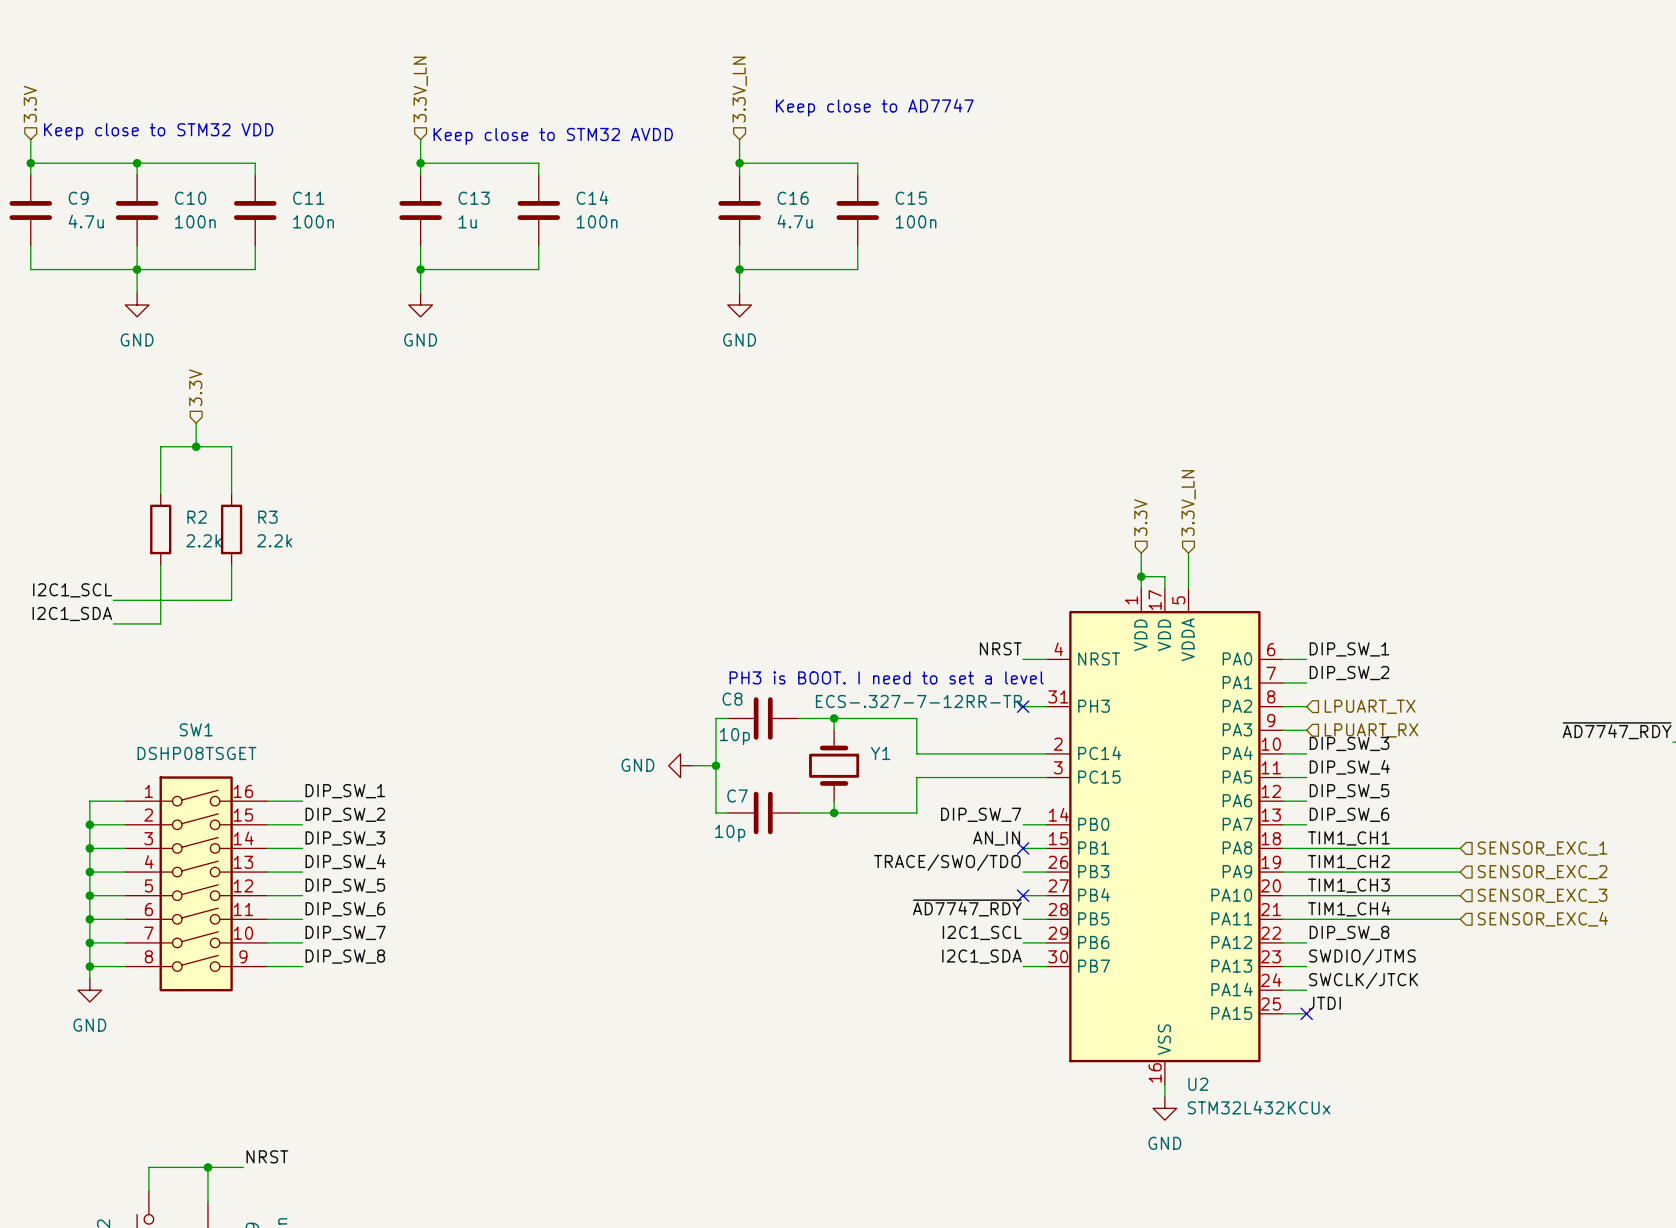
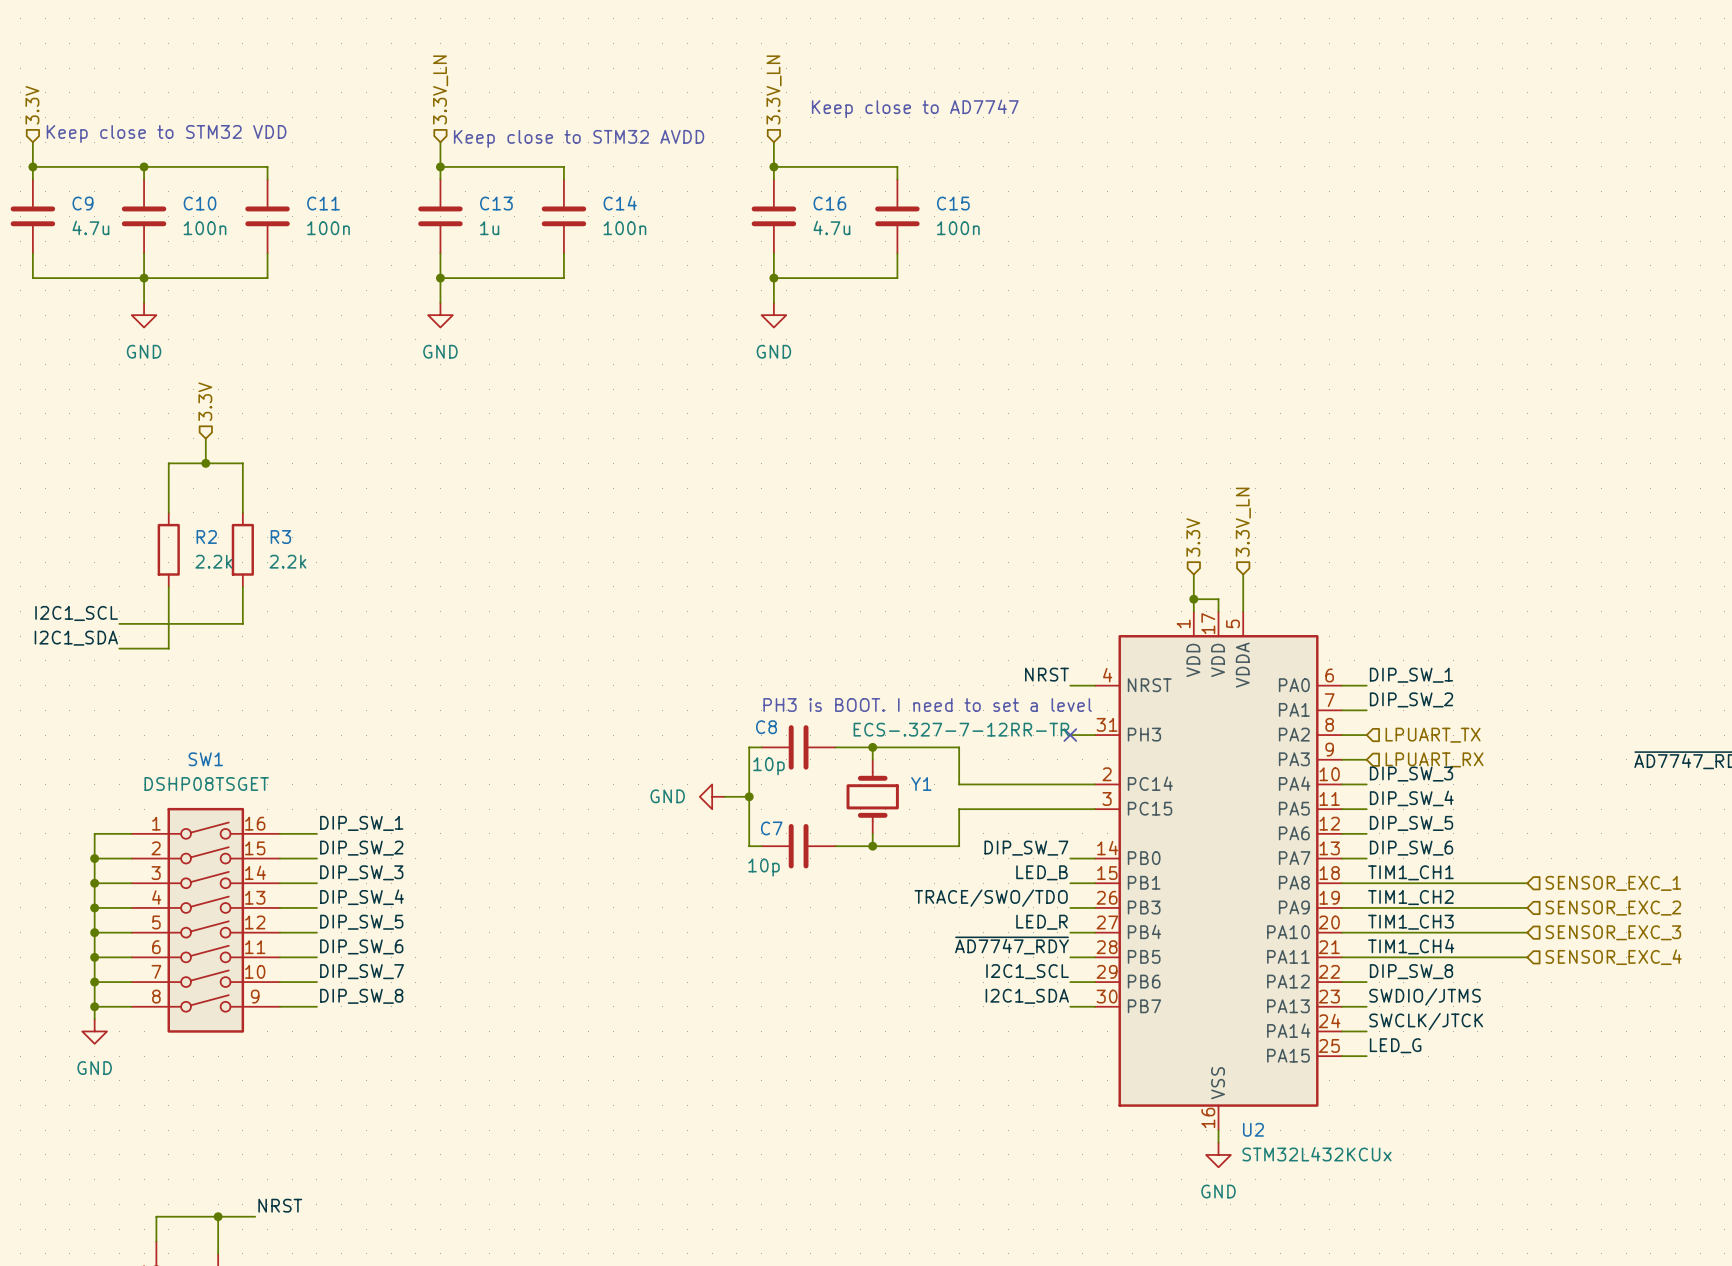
label: AN_IN (996, 838) -> LED_B (1041, 872)
no-connect mark: (1023, 848) -> none
label: none -> LED_R (1041, 922)
no-connect mark: (1023, 895) -> none
label: JTDI (1324, 1003) -> LED_G (1395, 1045)
no-connect mark: (1306, 1013) -> none

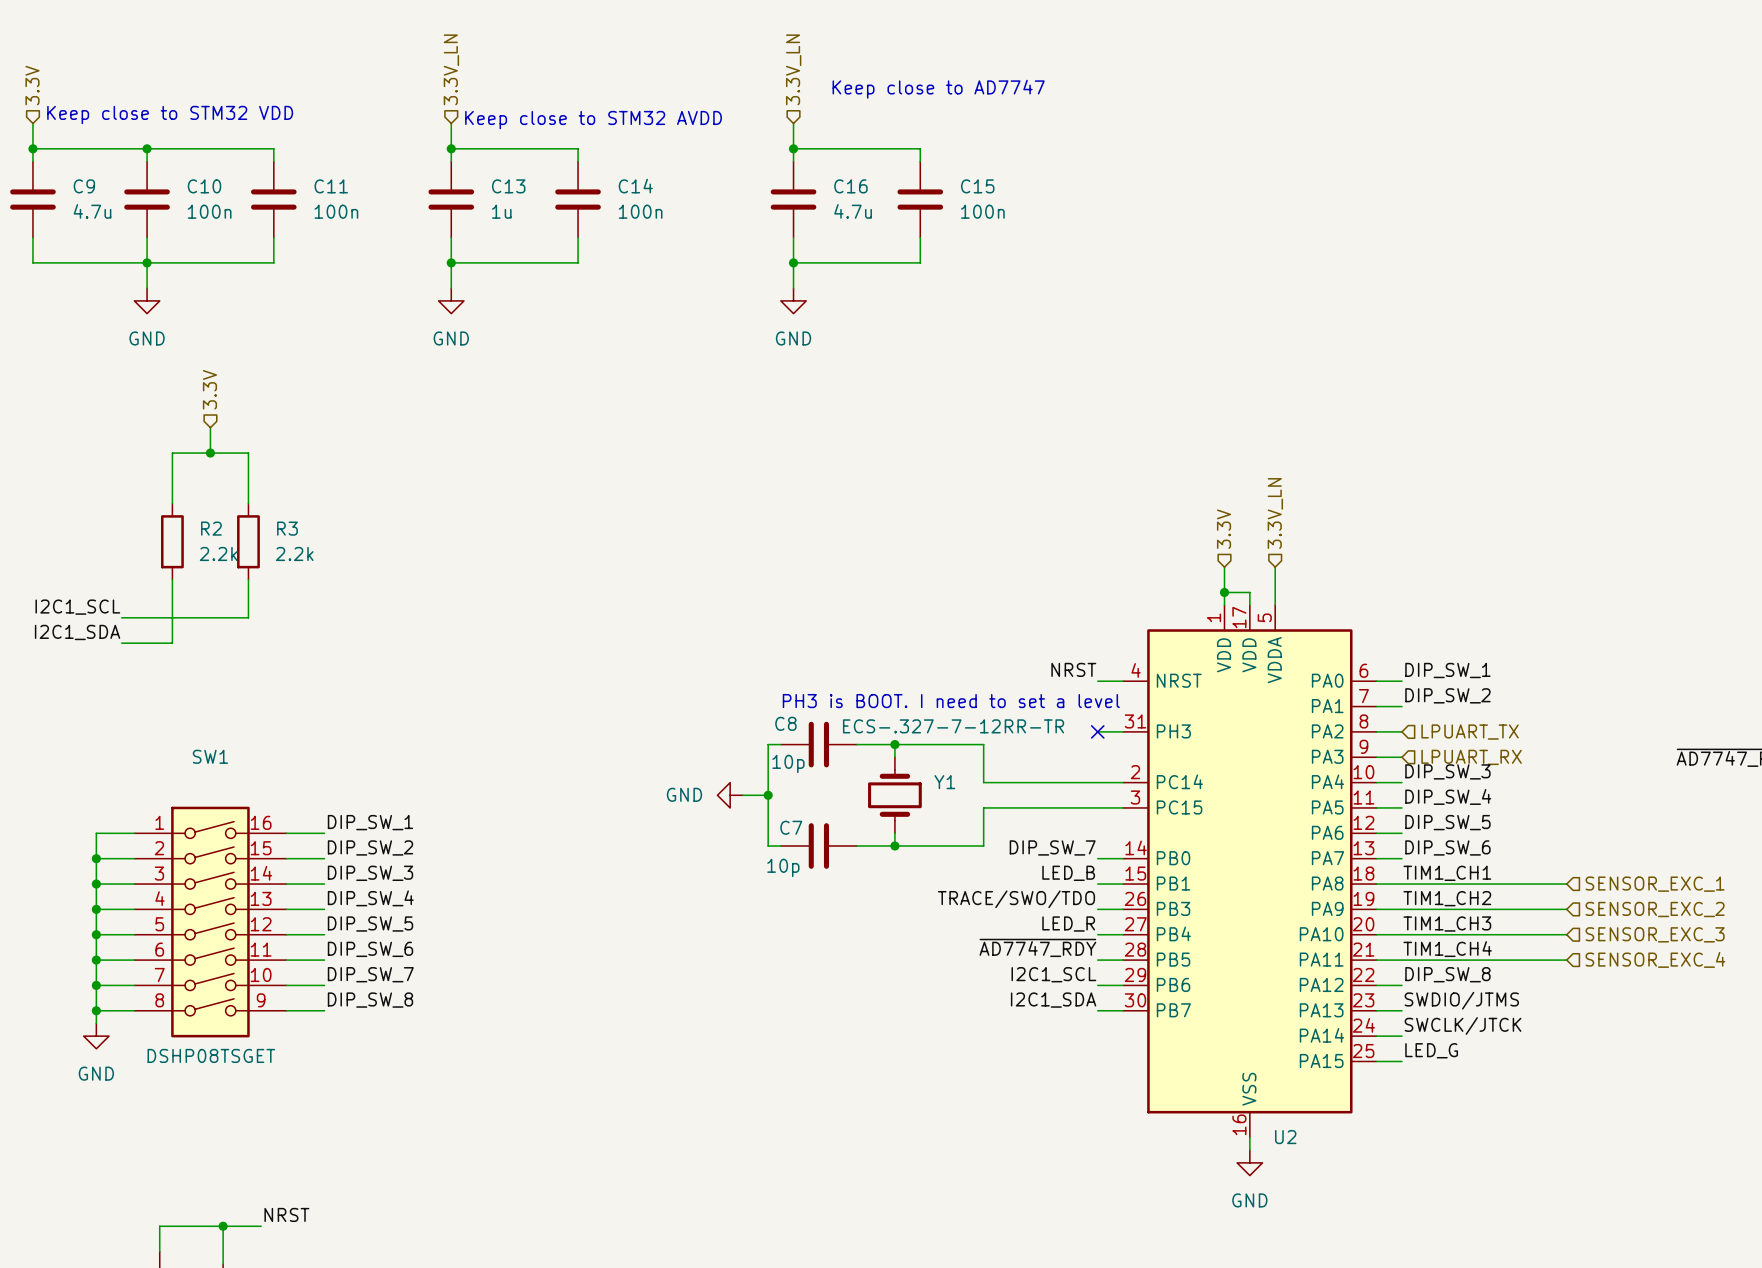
Y1 text: none -> ECS-.327-7-12RR-TR (953, 726)
Y1 value: ECS-.327-7-12RR-TR (961, 729) -> none
SW1 value: DSHP08TSGET (206, 783) -> none
SW1 text: none -> DSHP08TSGET (211, 1055)
U2 value: STM32L432KCUx (1316, 1154) -> none

